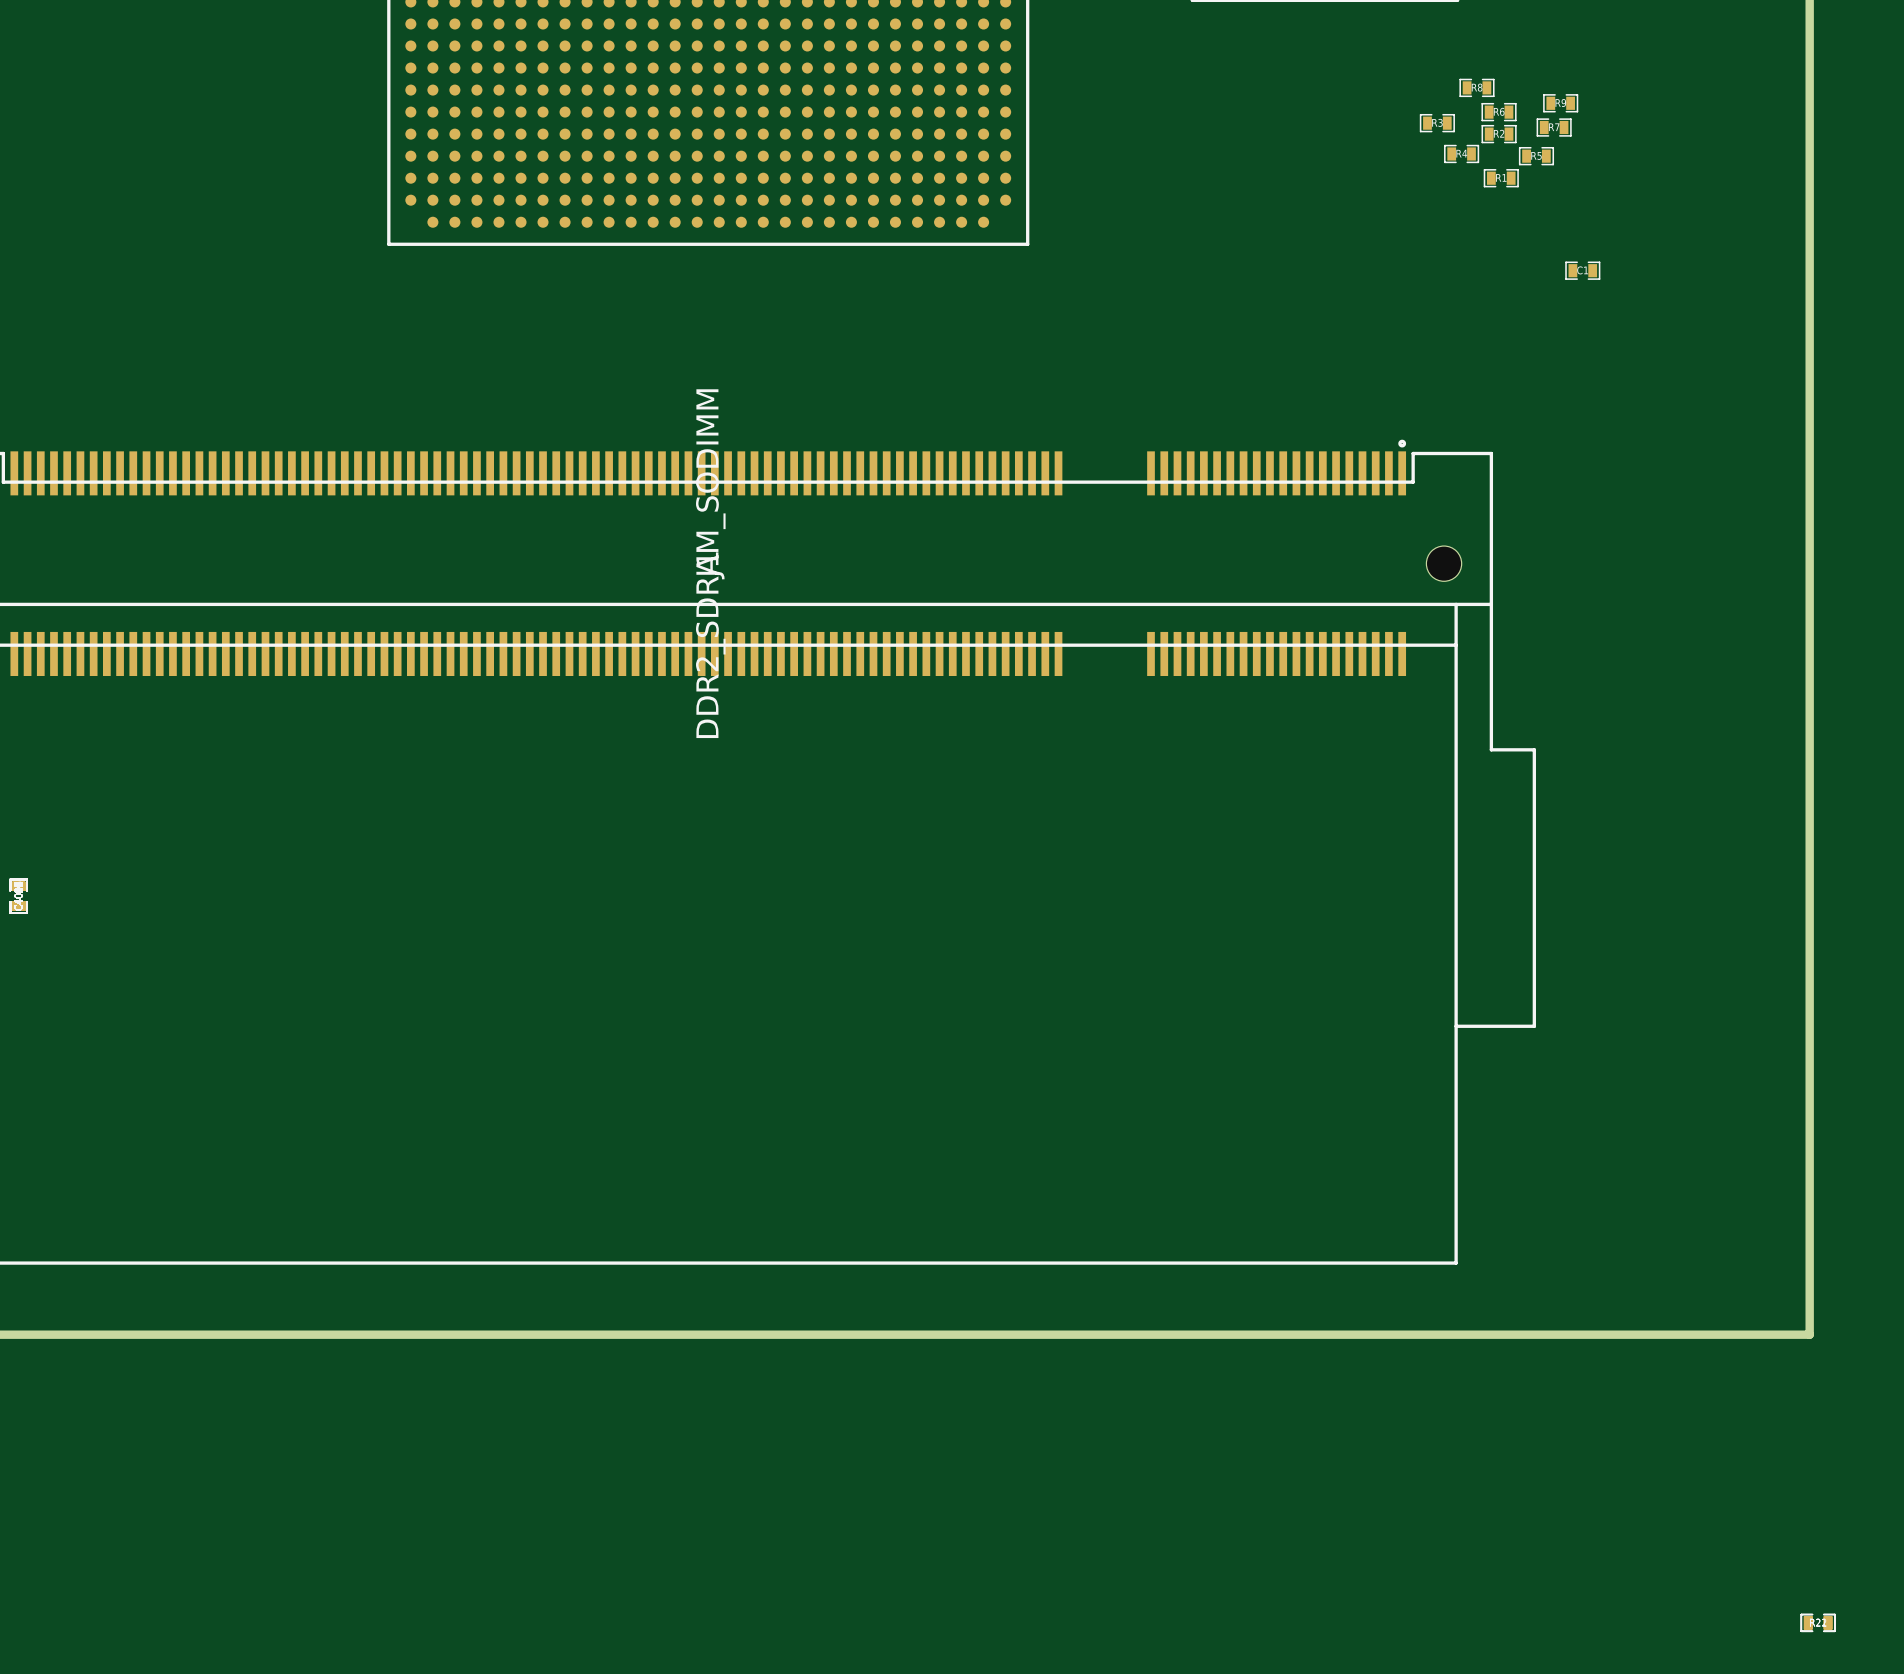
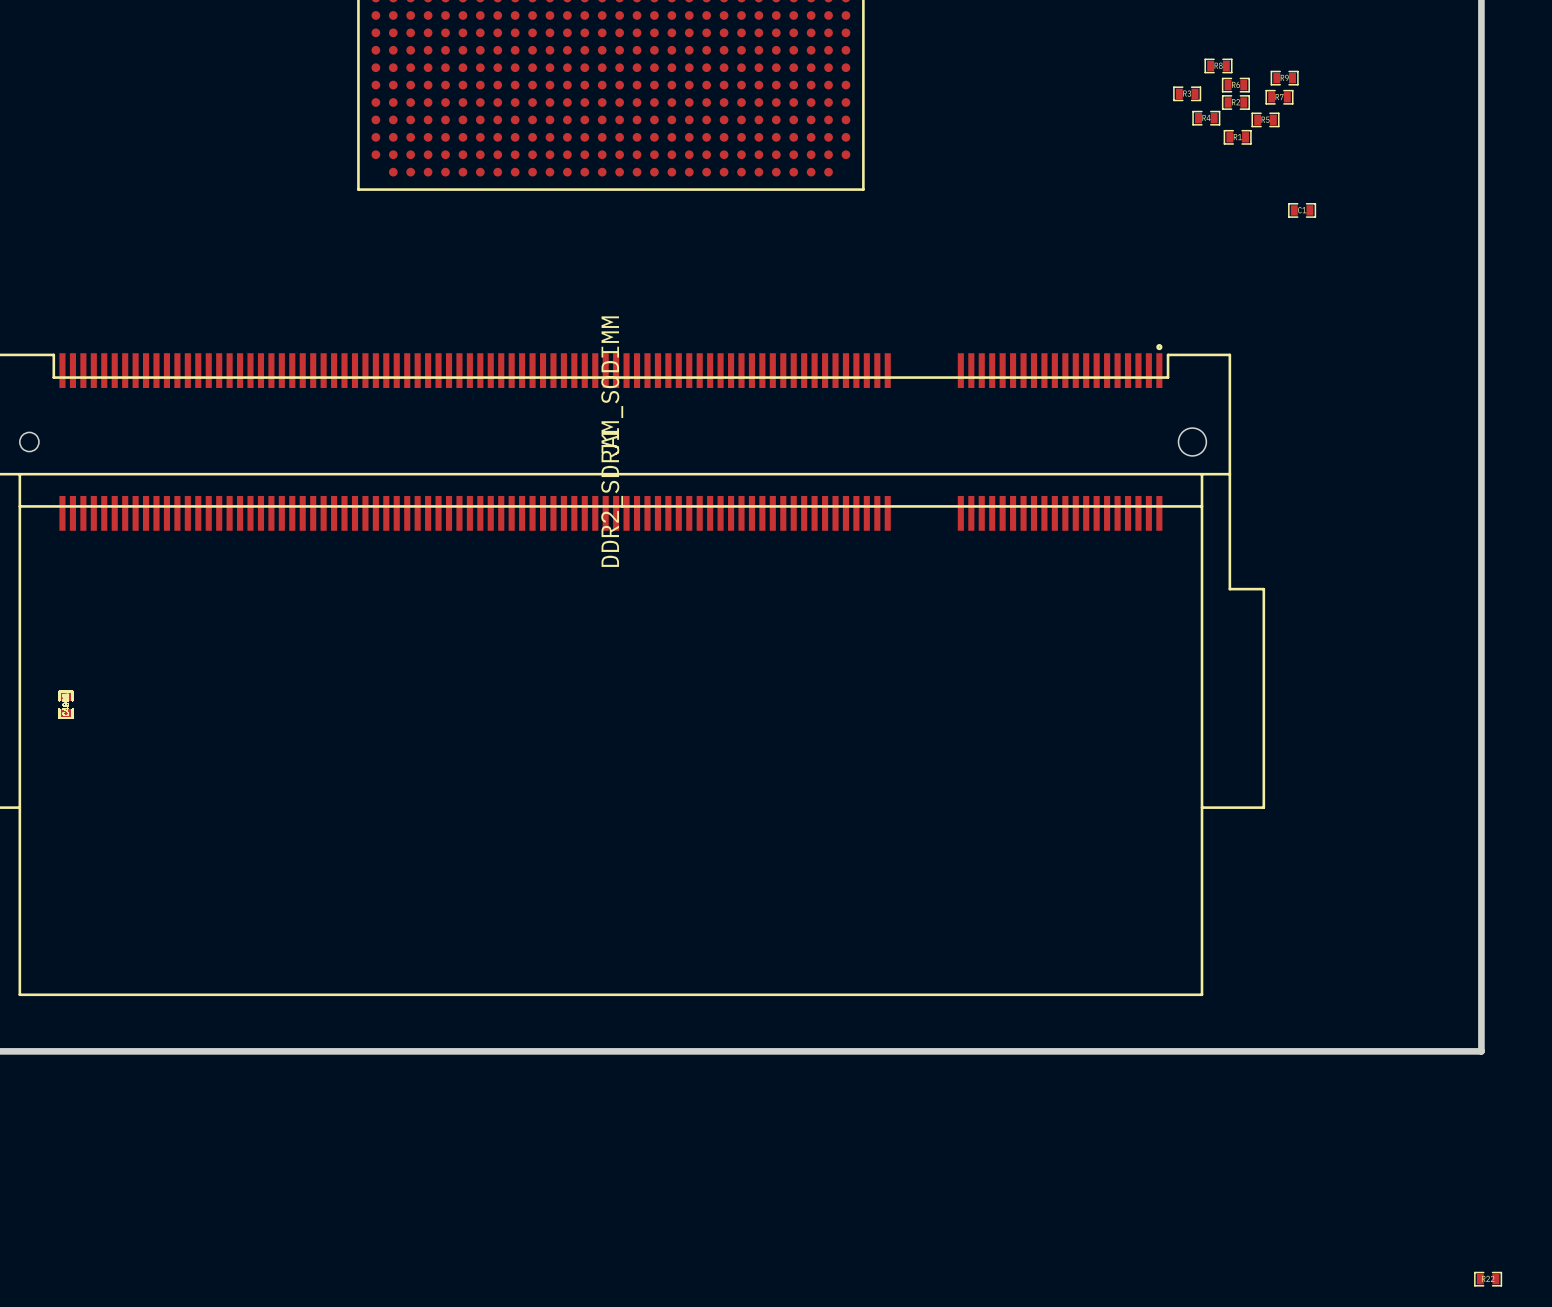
part: (1818, 1622) -> none

